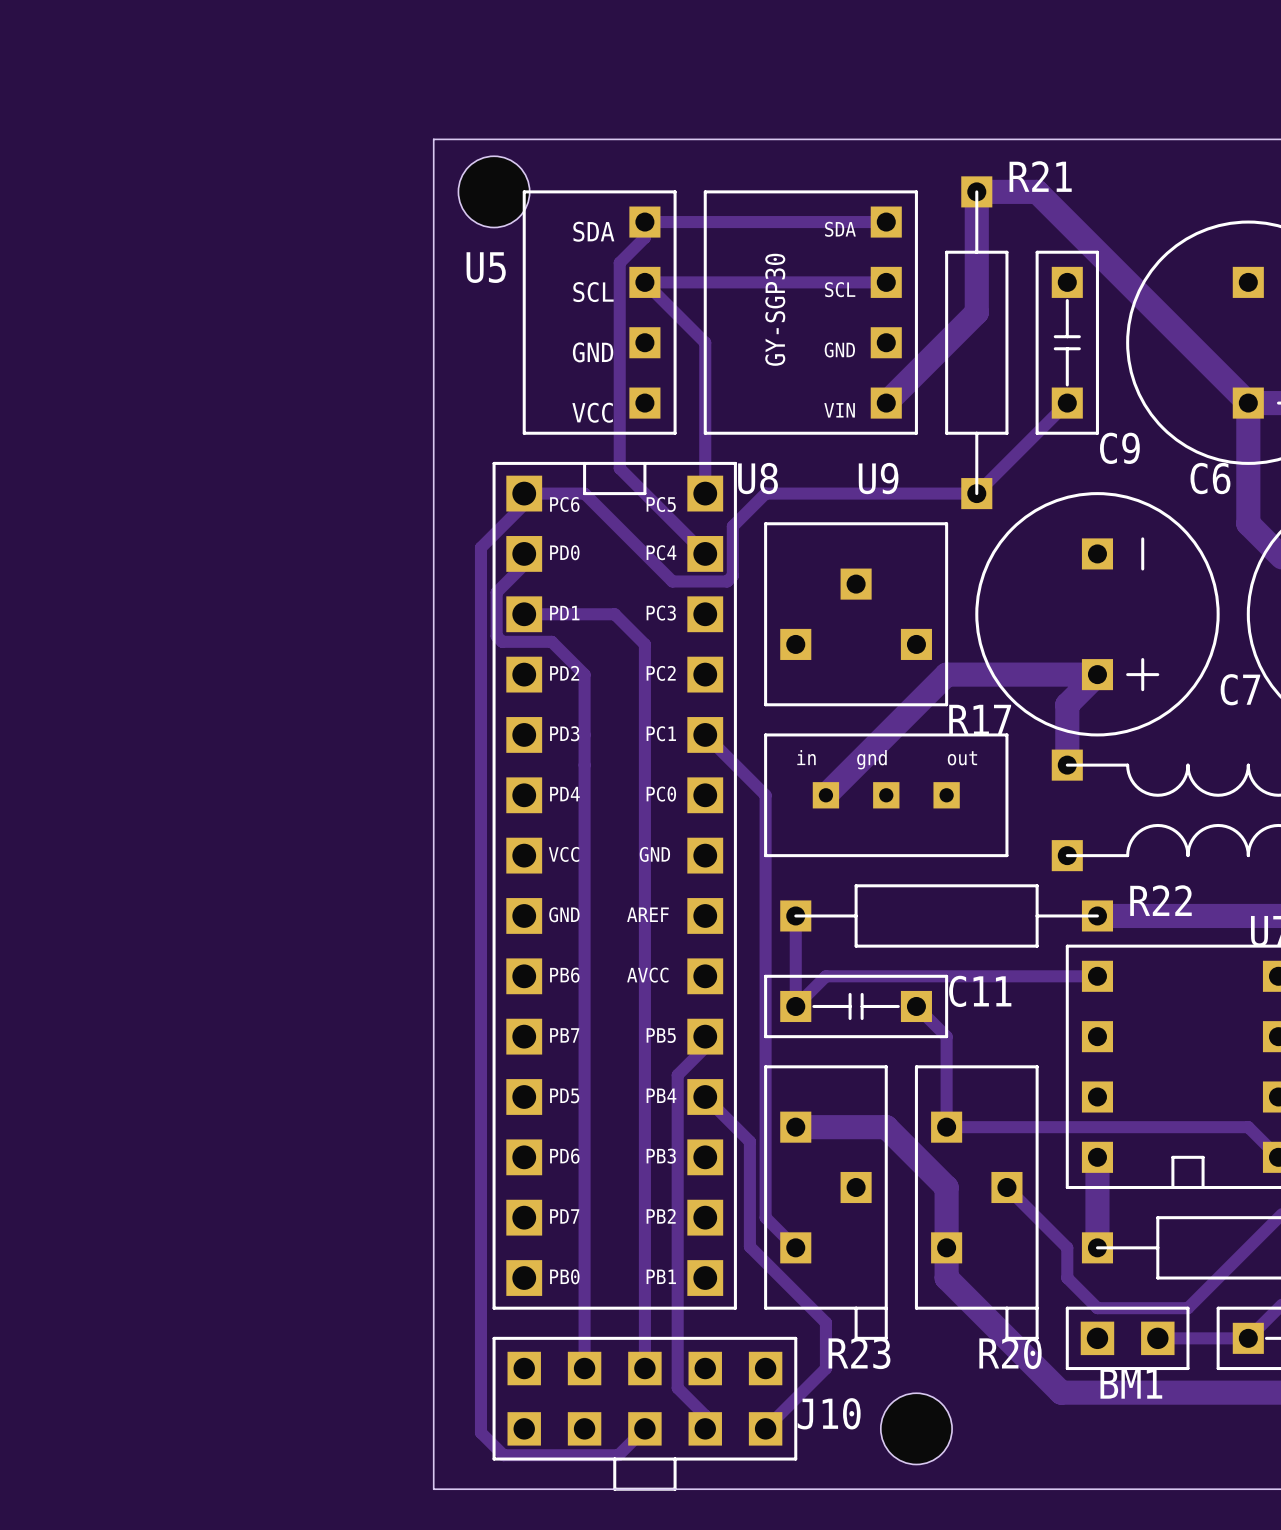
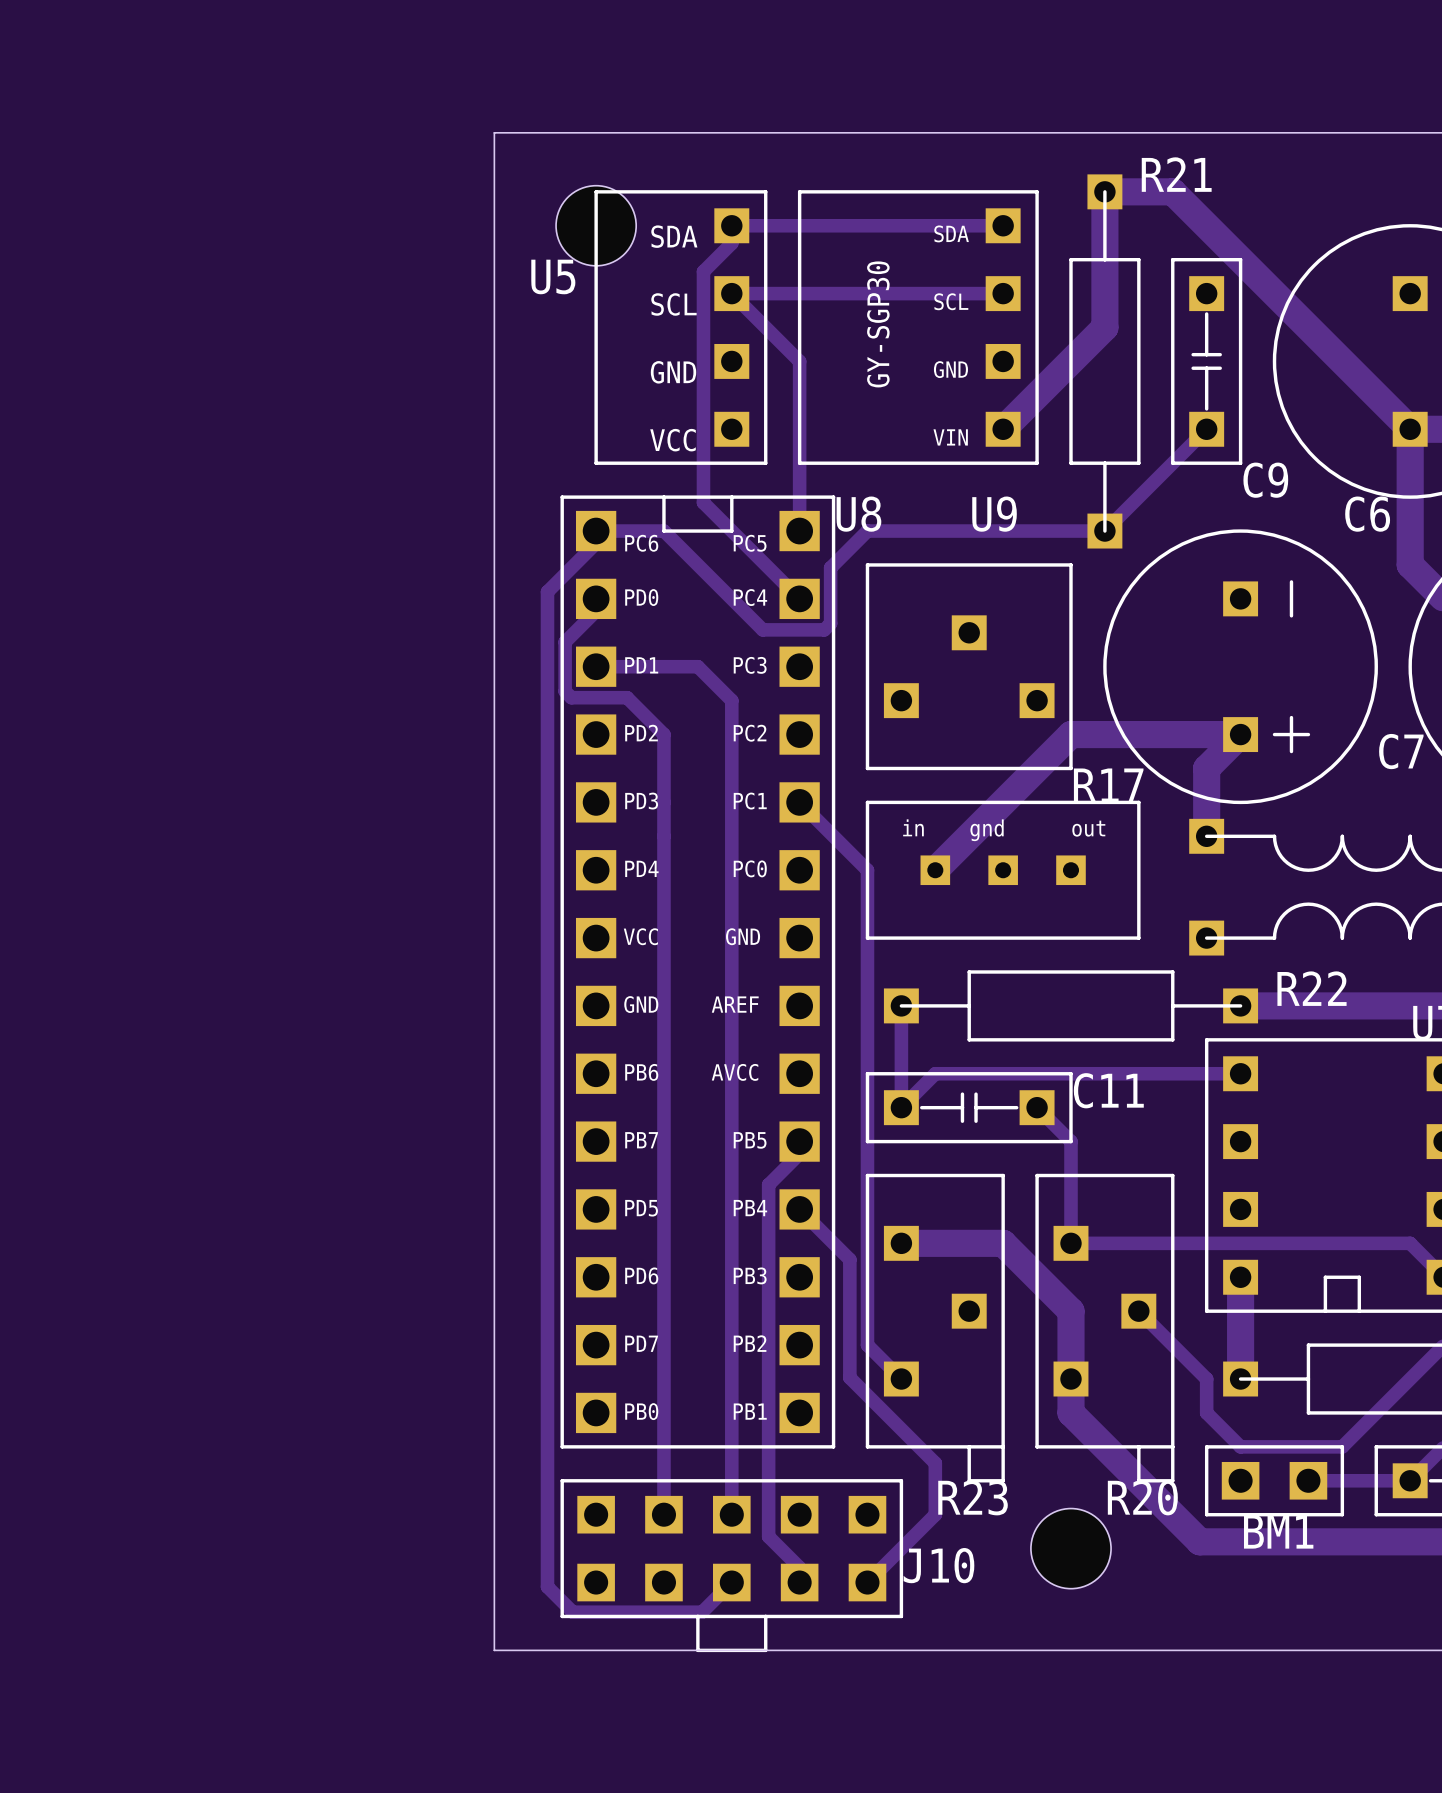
hole position: (494, 191) -> (596, 225)
hole position: (916, 1428) -> (1070, 1548)

